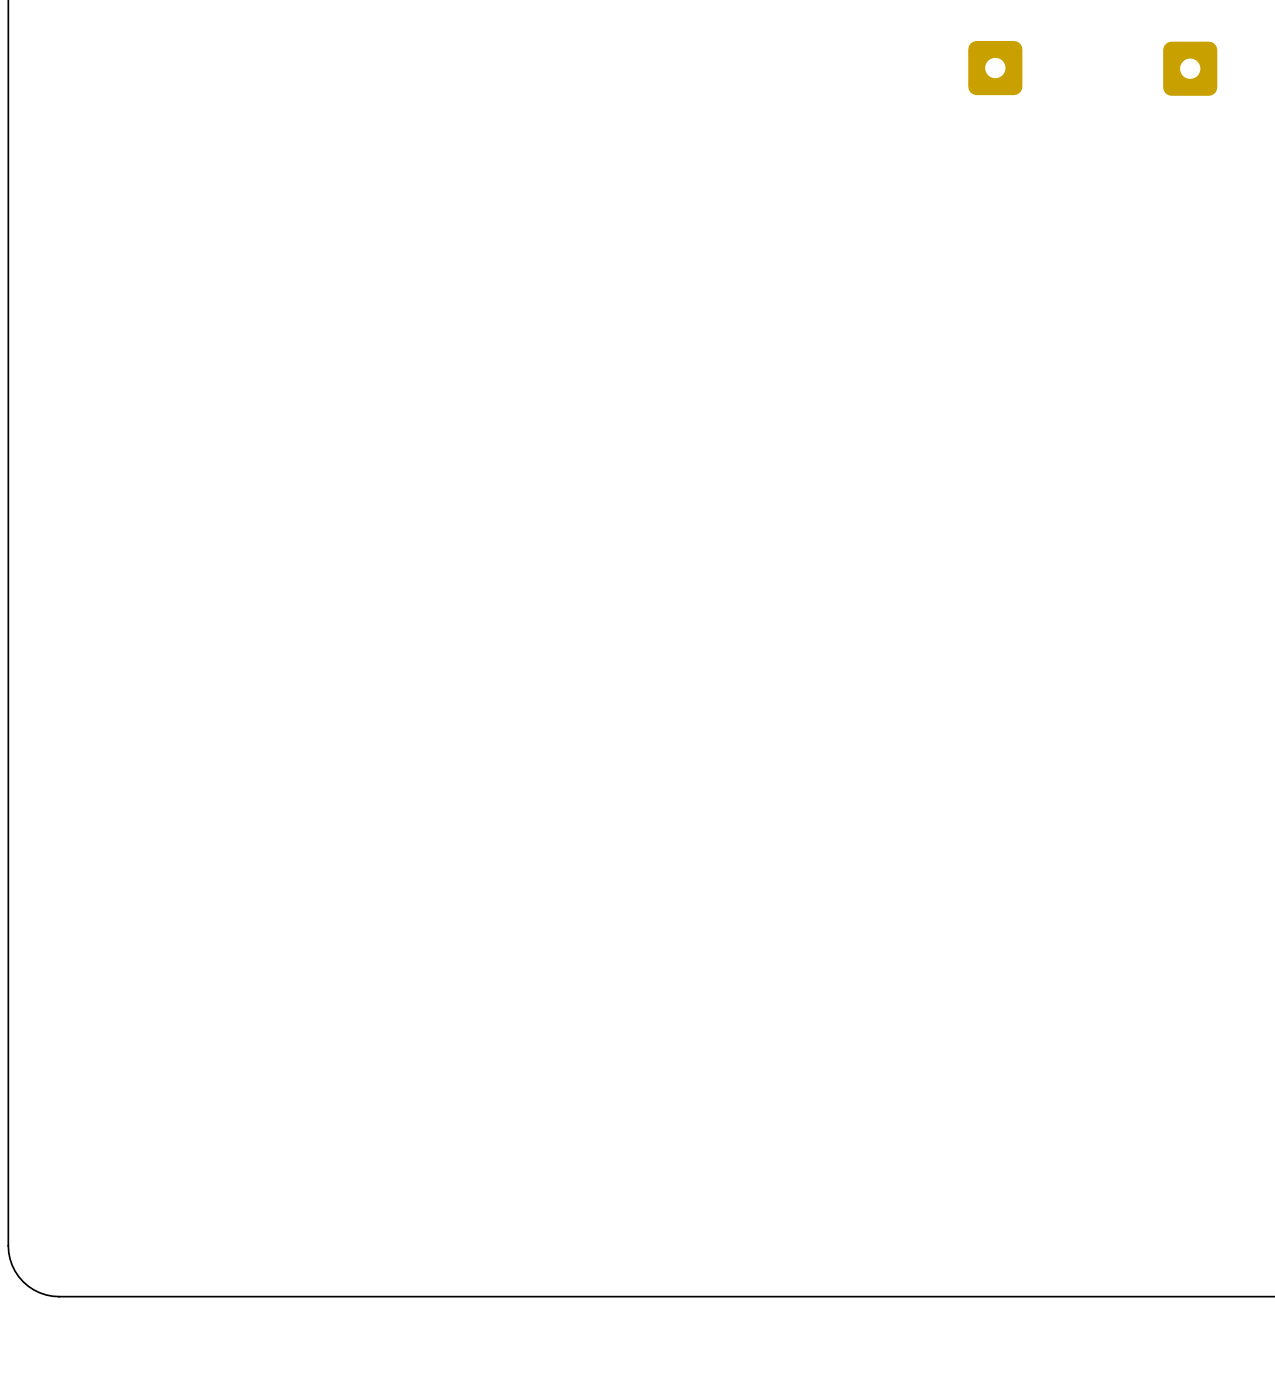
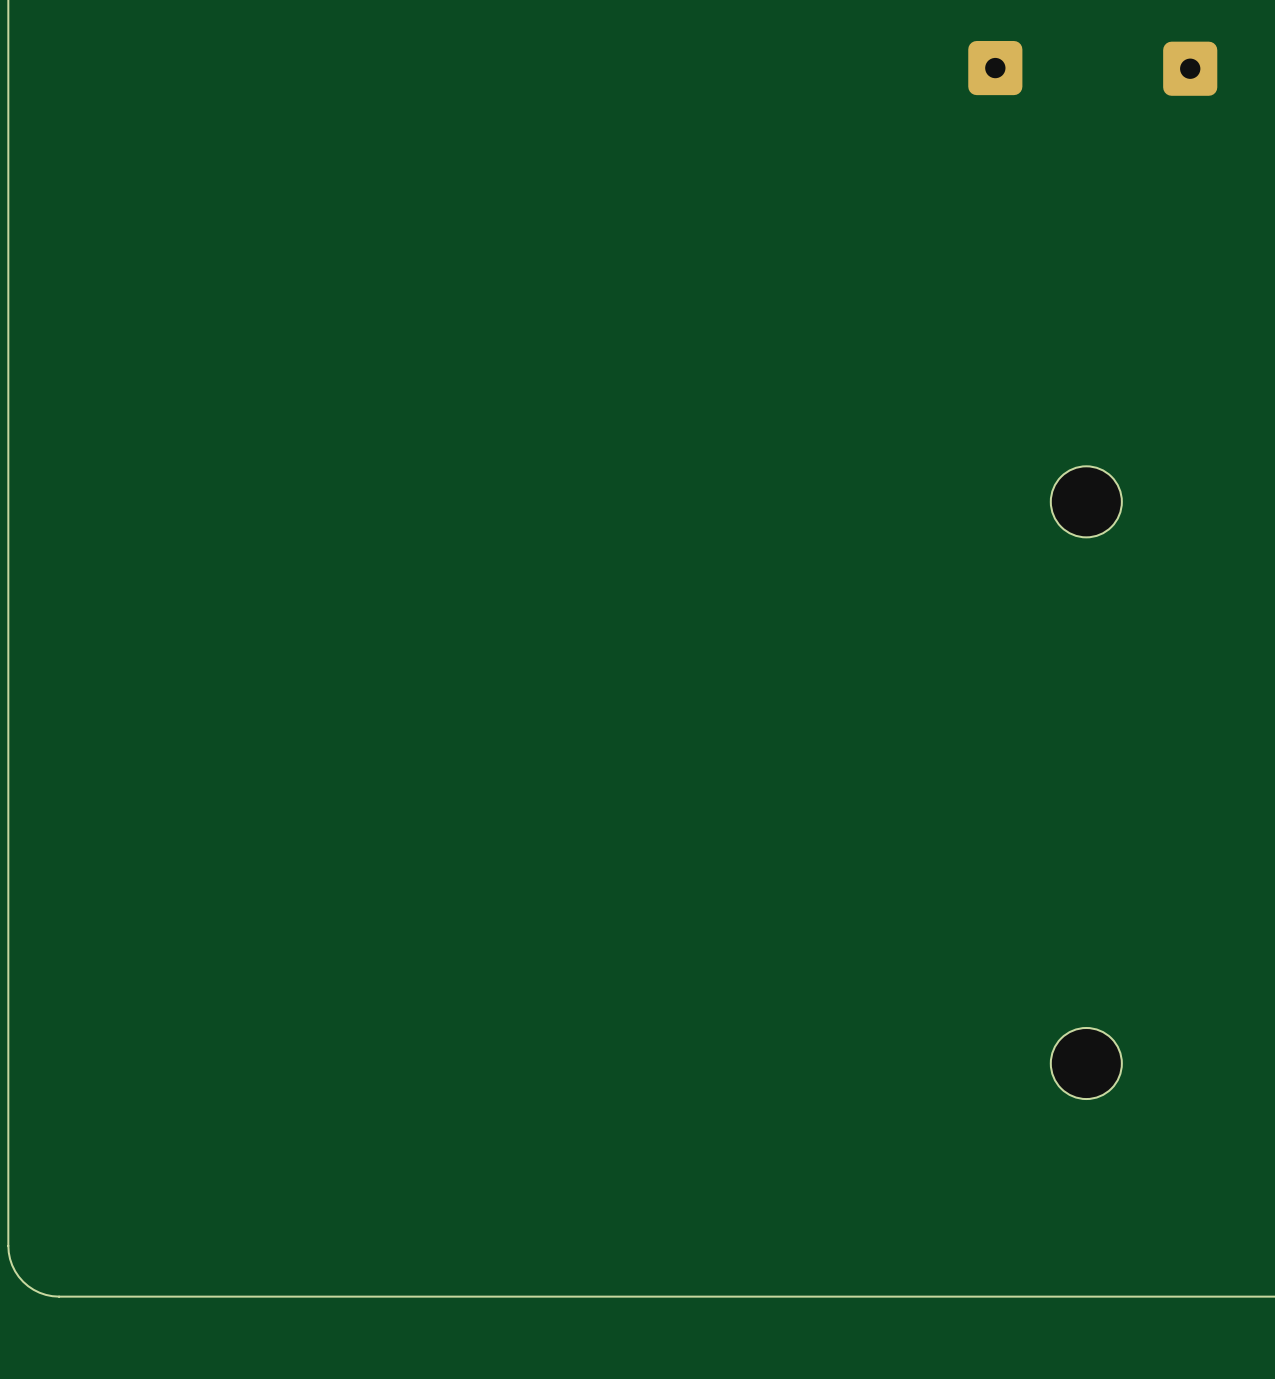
part: none -> (1086, 501)
part: none -> (1086, 1063)

